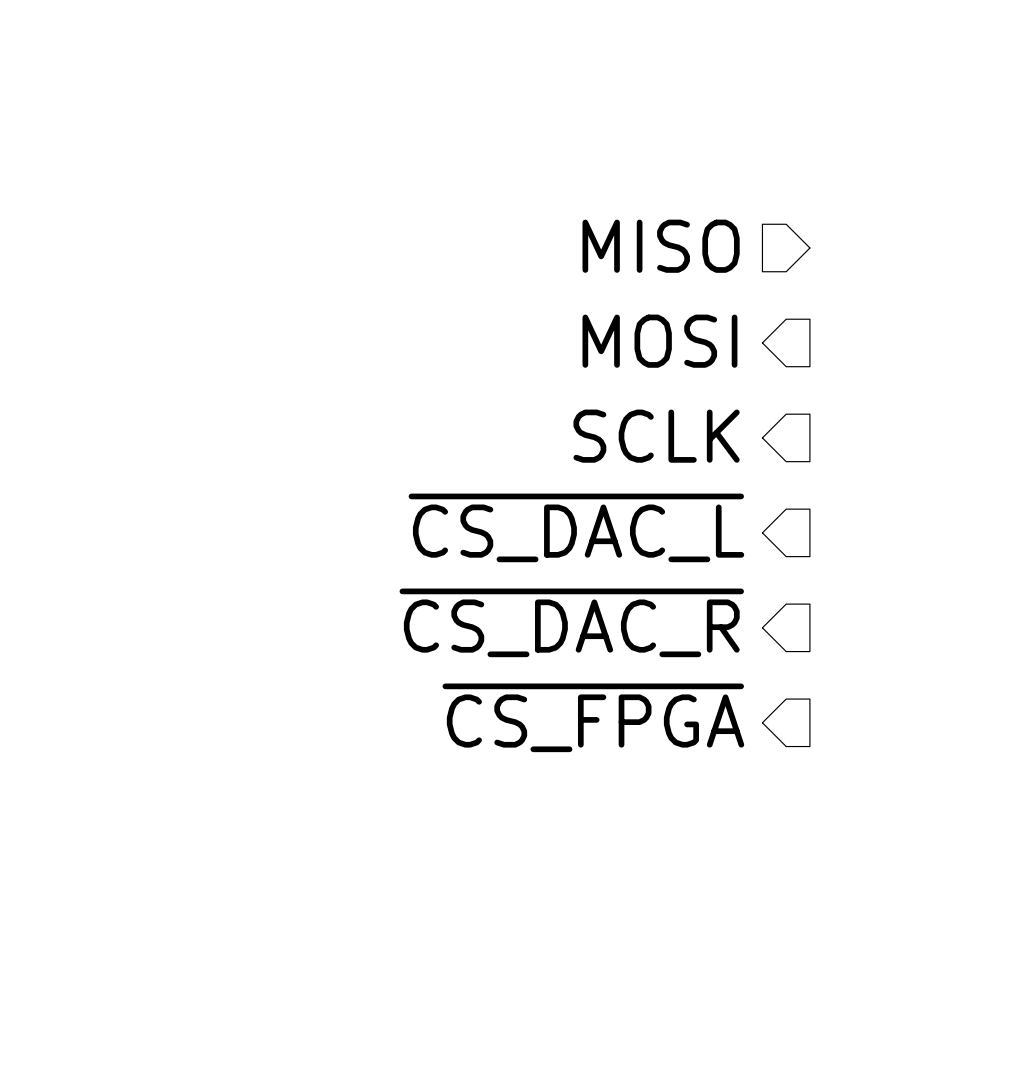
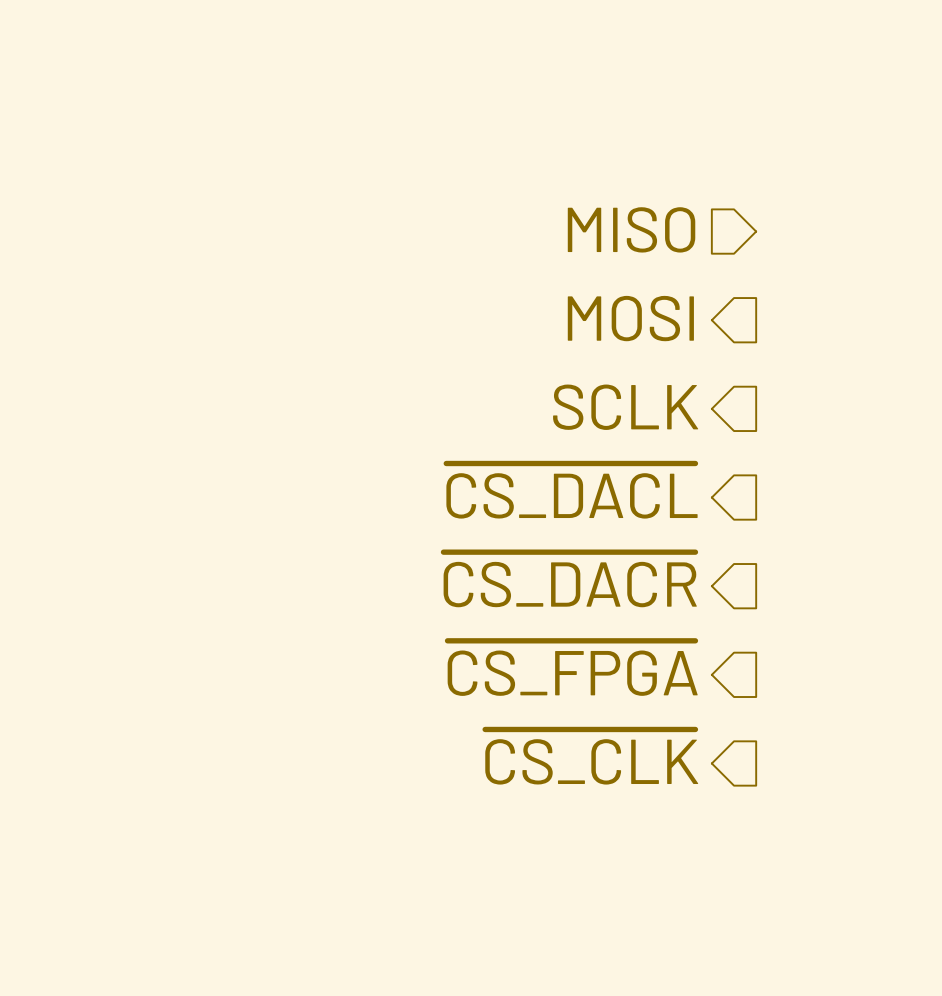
hierarchical label: ~{CS_DAC_L} (576, 527) -> ~{CS_DACL} (571, 491)
hierarchical label: ~{CS_DAC_R} (571, 622) -> ~{CS_DACR} (570, 579)
hierarchical label: none -> ~{CS_CLK} (591, 757)

